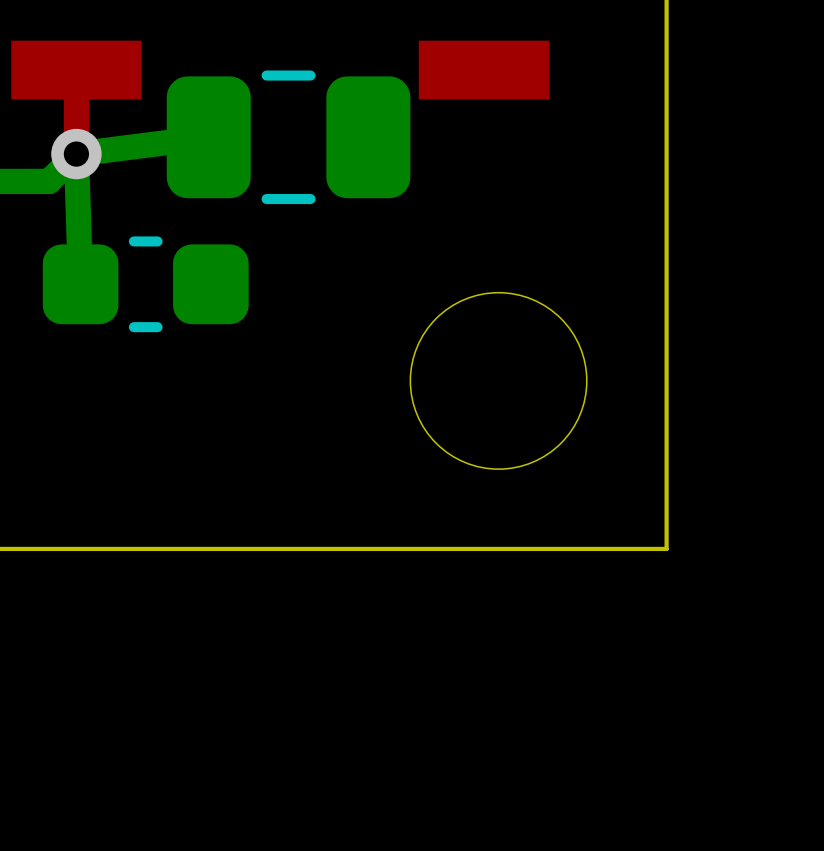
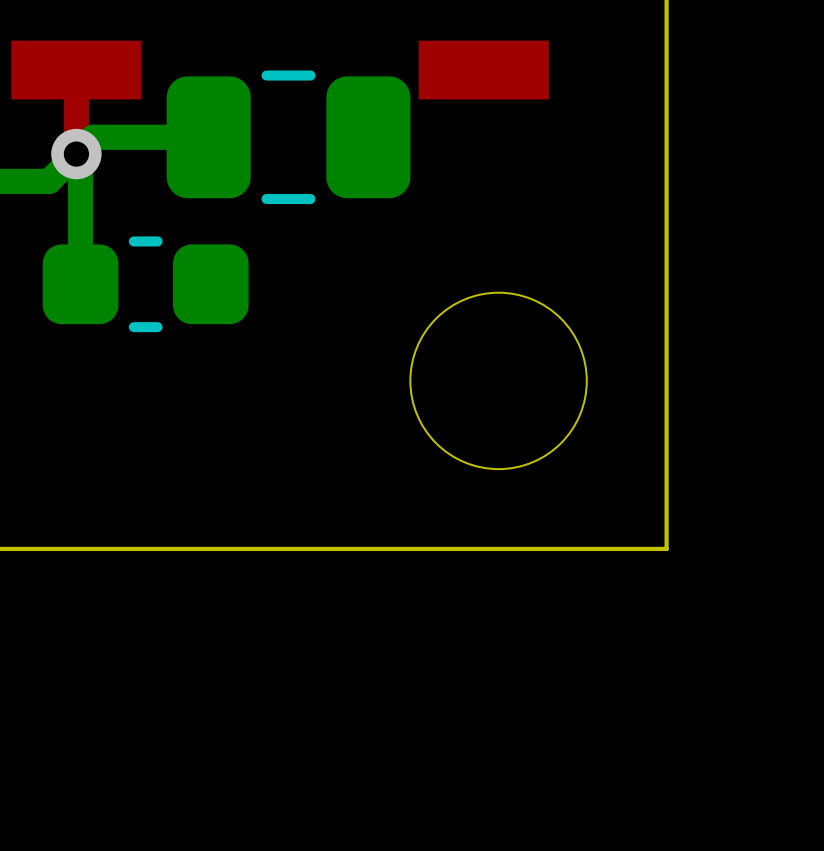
bottom track: (208, 137) (76, 154) (80, 284) -> (208, 137) (93, 137) (76, 154) (80, 158) (80, 284)

